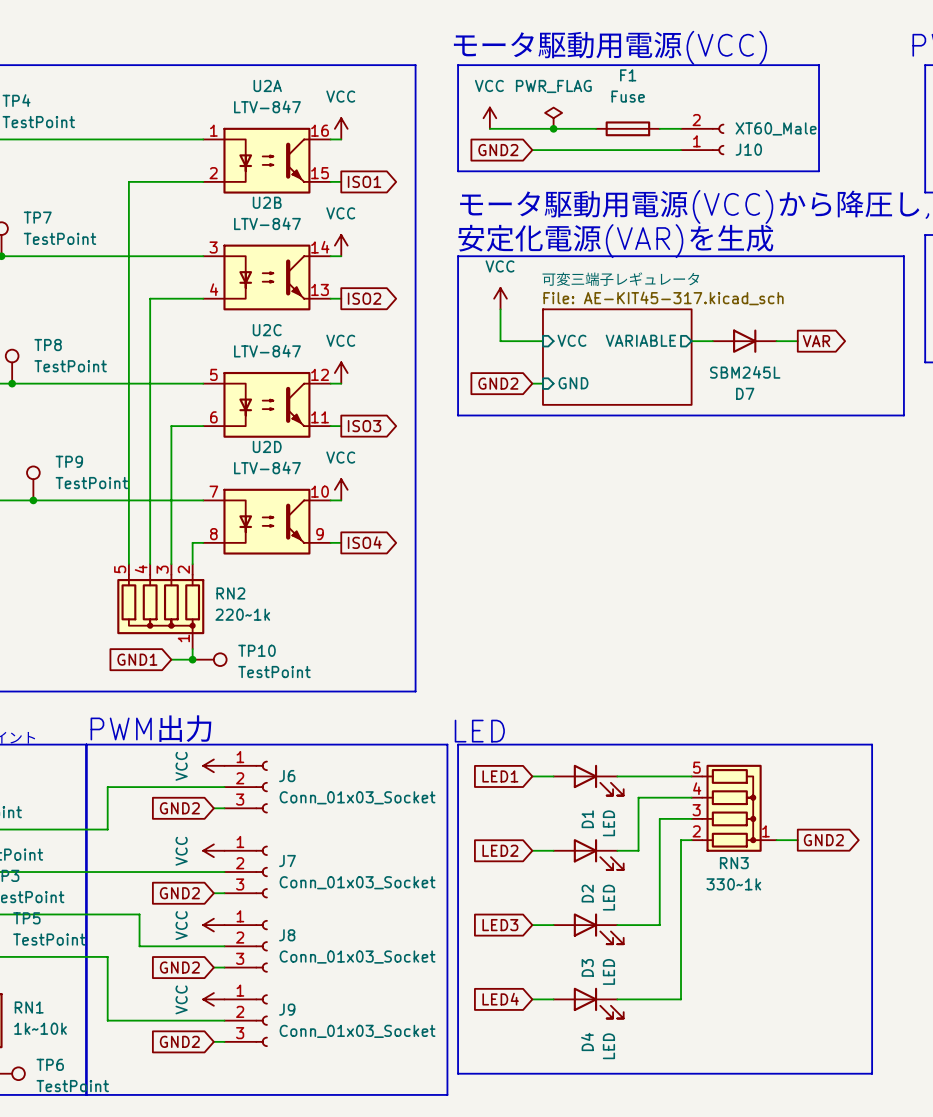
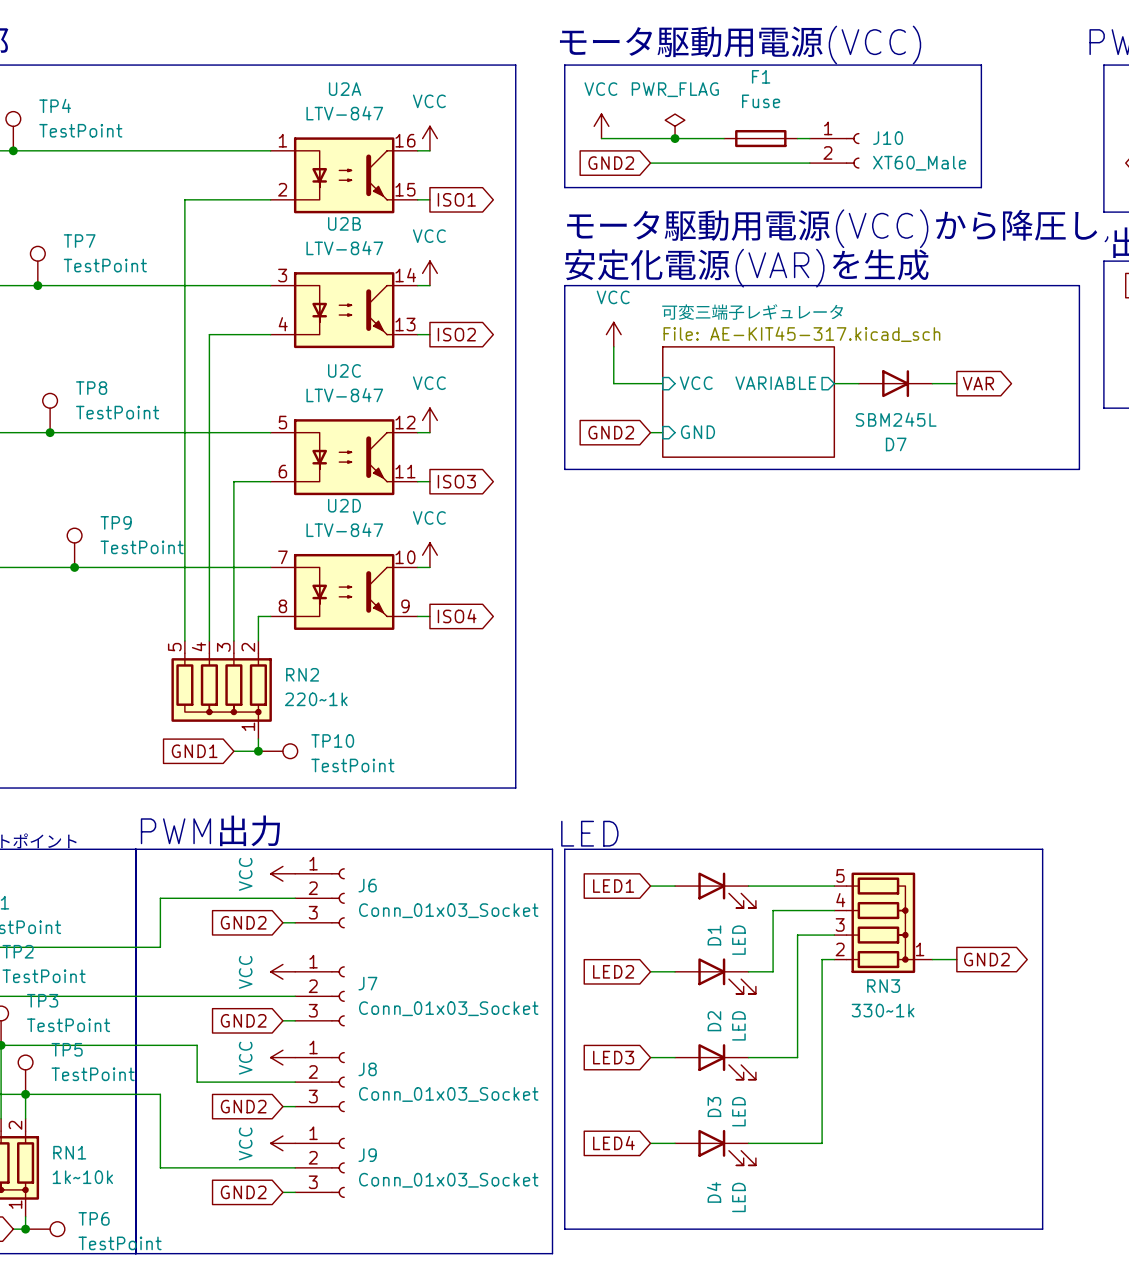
J10 flip: as is (718, 139) -> up-down (852, 150)

